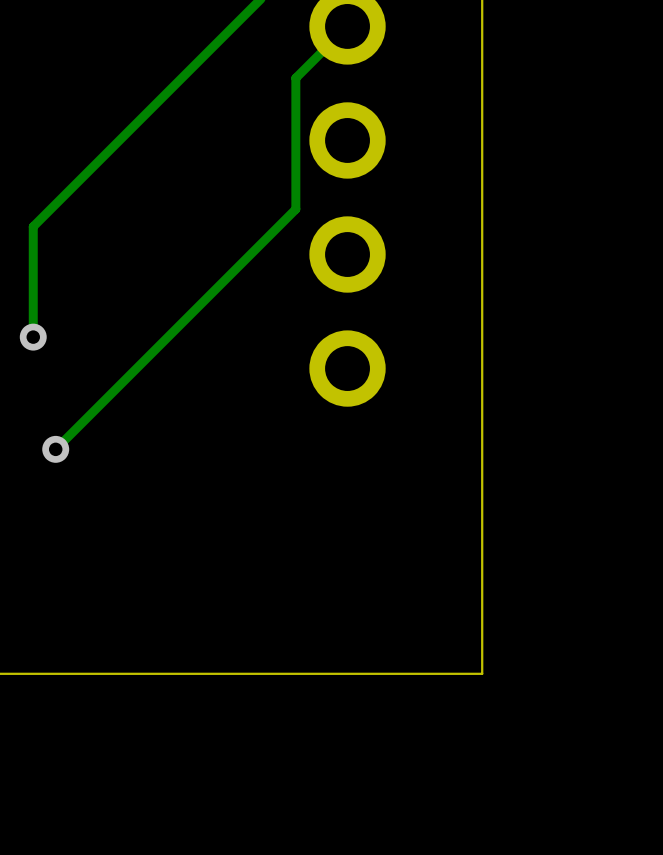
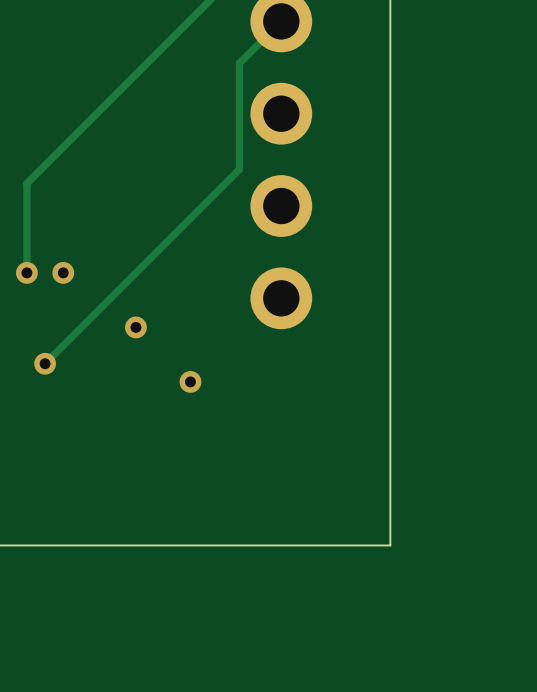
via: none -> (63, 272)
via: none -> (135, 327)
via: none -> (190, 381)

